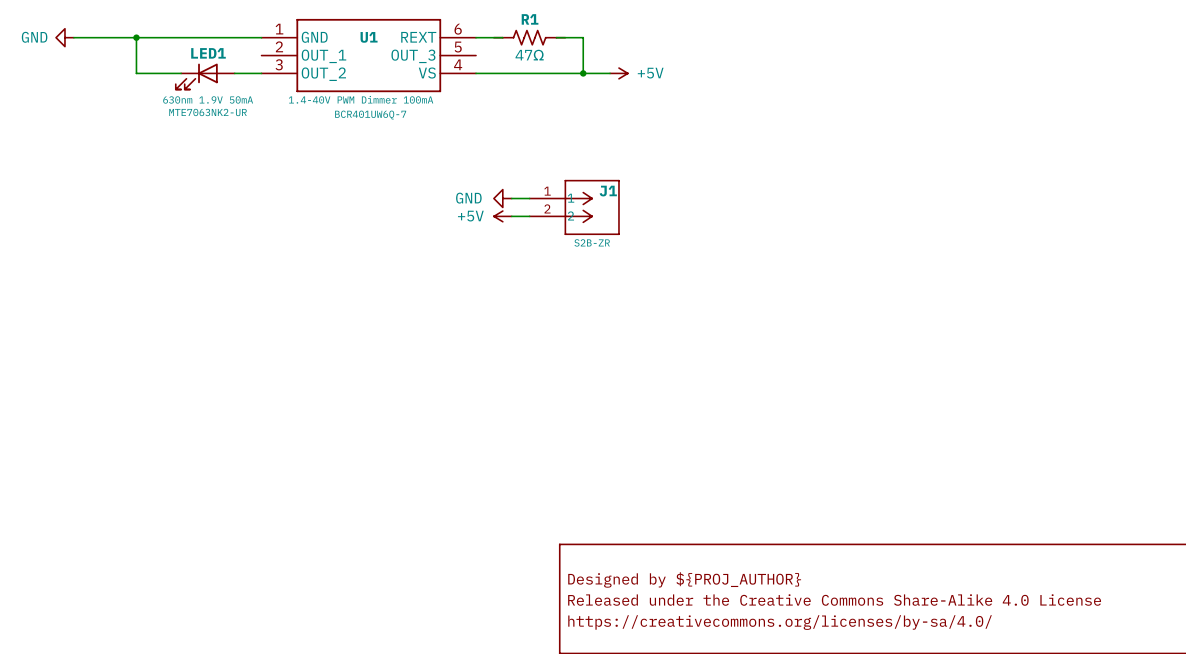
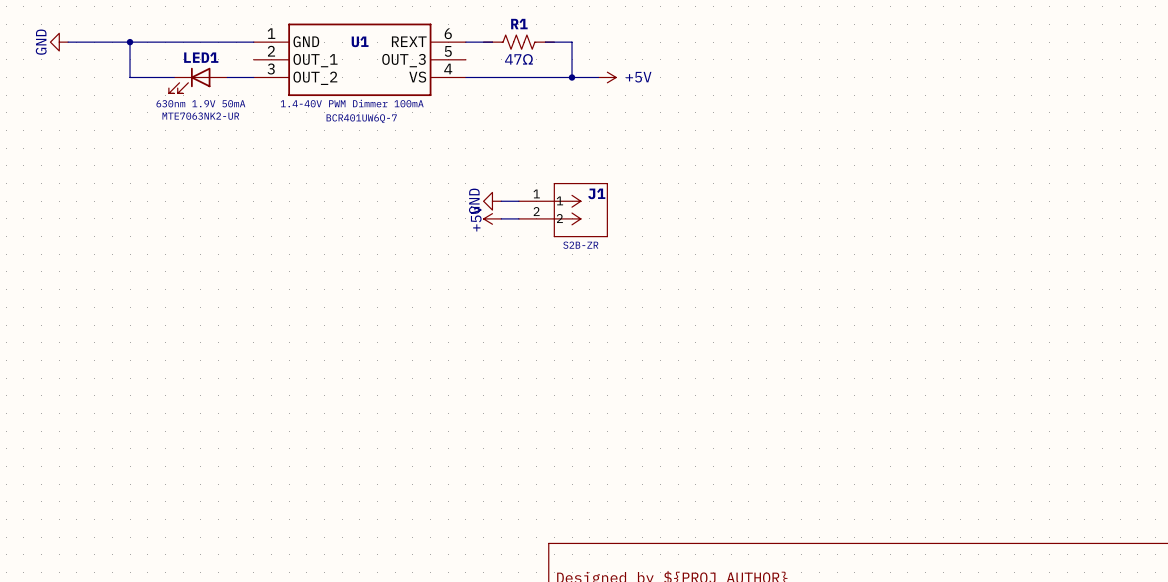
power symbol text rotation: 0° (34, 37) -> 90° counterclockwise (41, 42)
power symbol text rotation: 0° (468, 198) -> 90° counterclockwise (474, 201)
power symbol text rotation: 0° (470, 216) -> 90° counterclockwise (476, 218)

